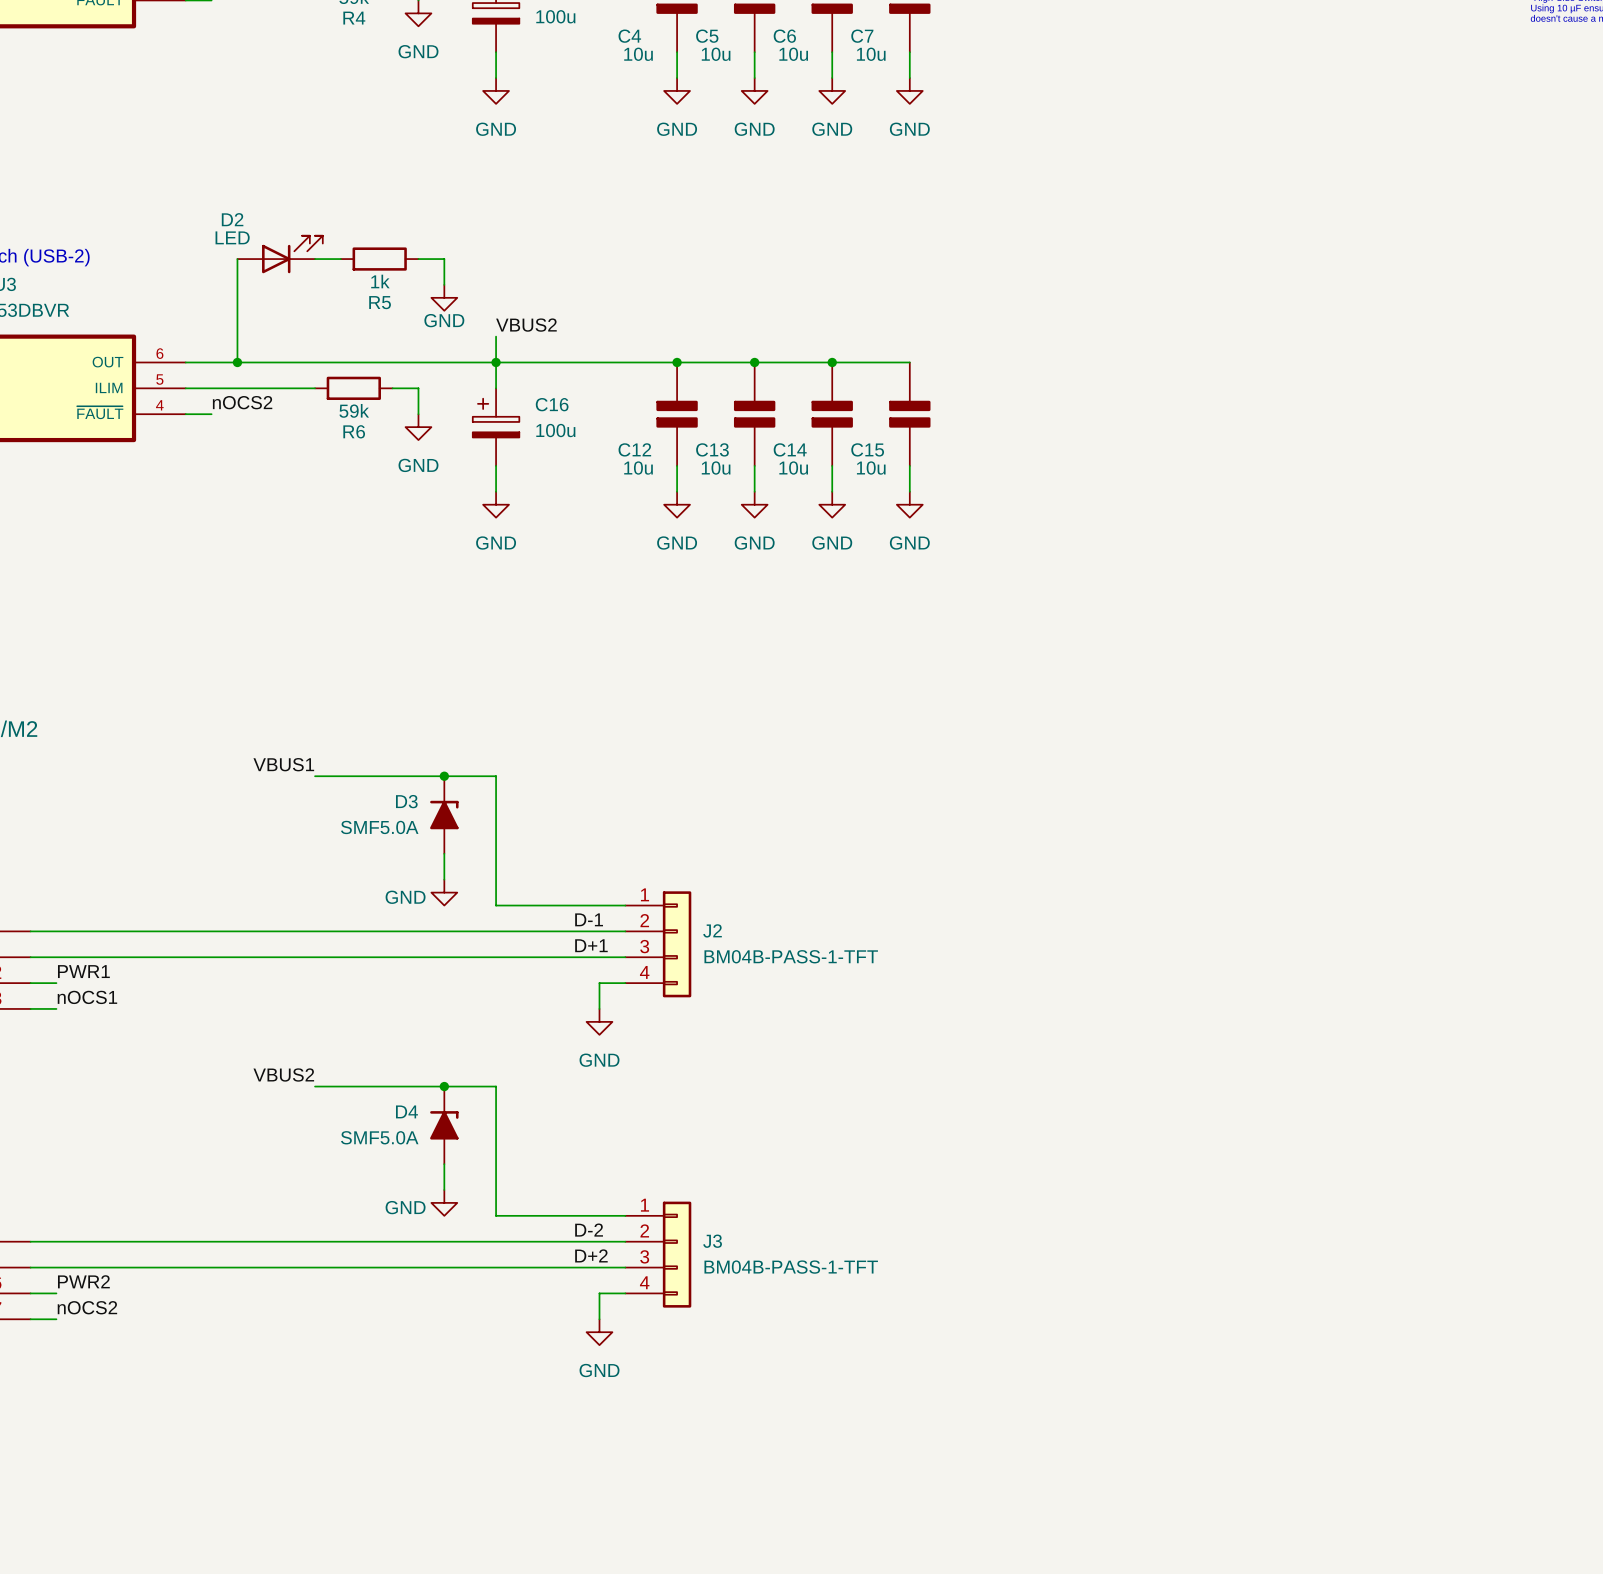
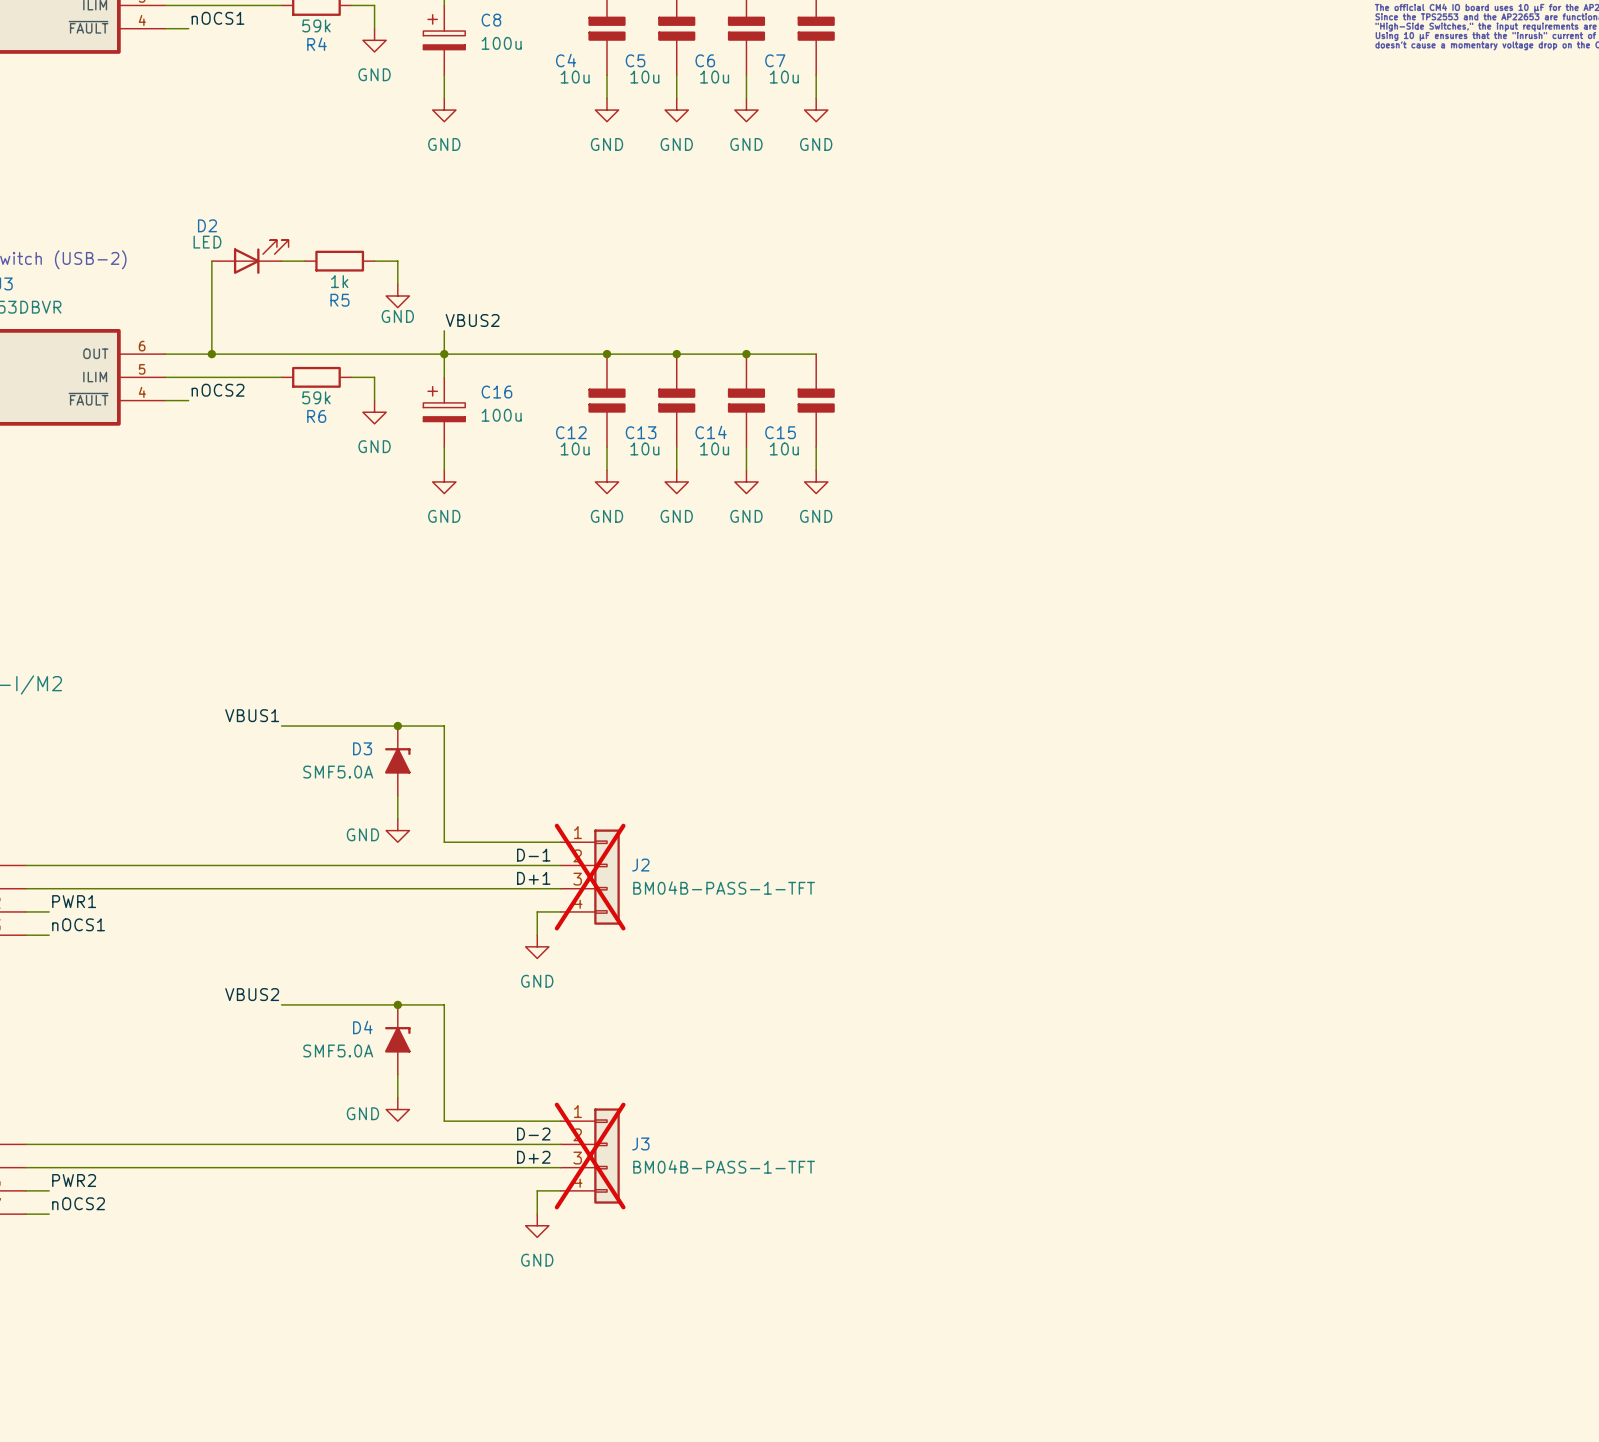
J2 do-not-place cross: none -> (590, 877)
J3 do-not-place cross: none -> (590, 1156)

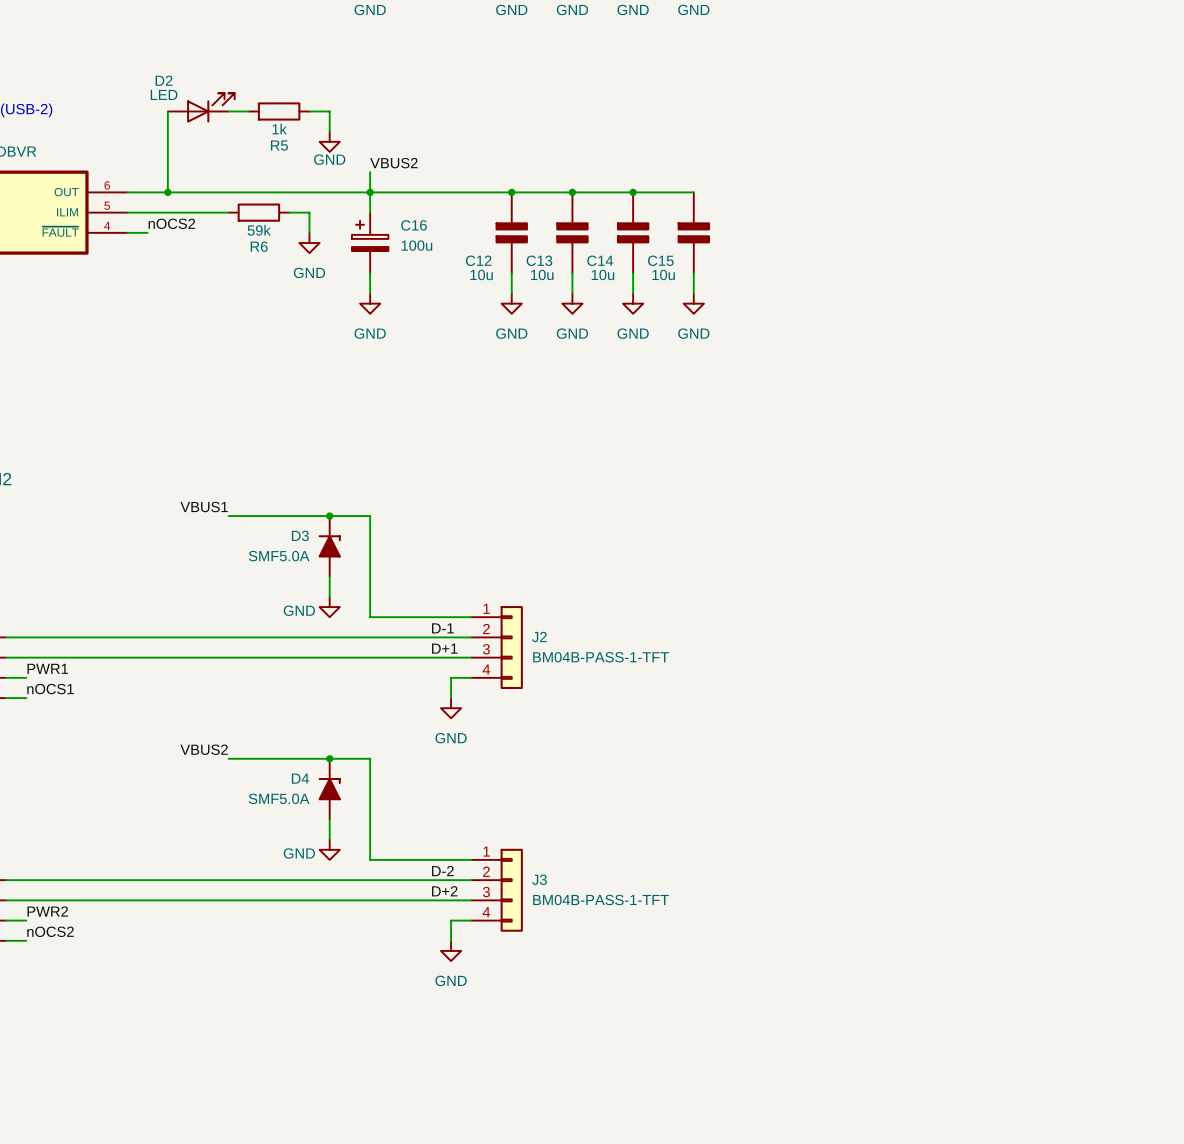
J2 do-not-place cross: (590, 877) -> none
J3 do-not-place cross: (590, 1156) -> none

